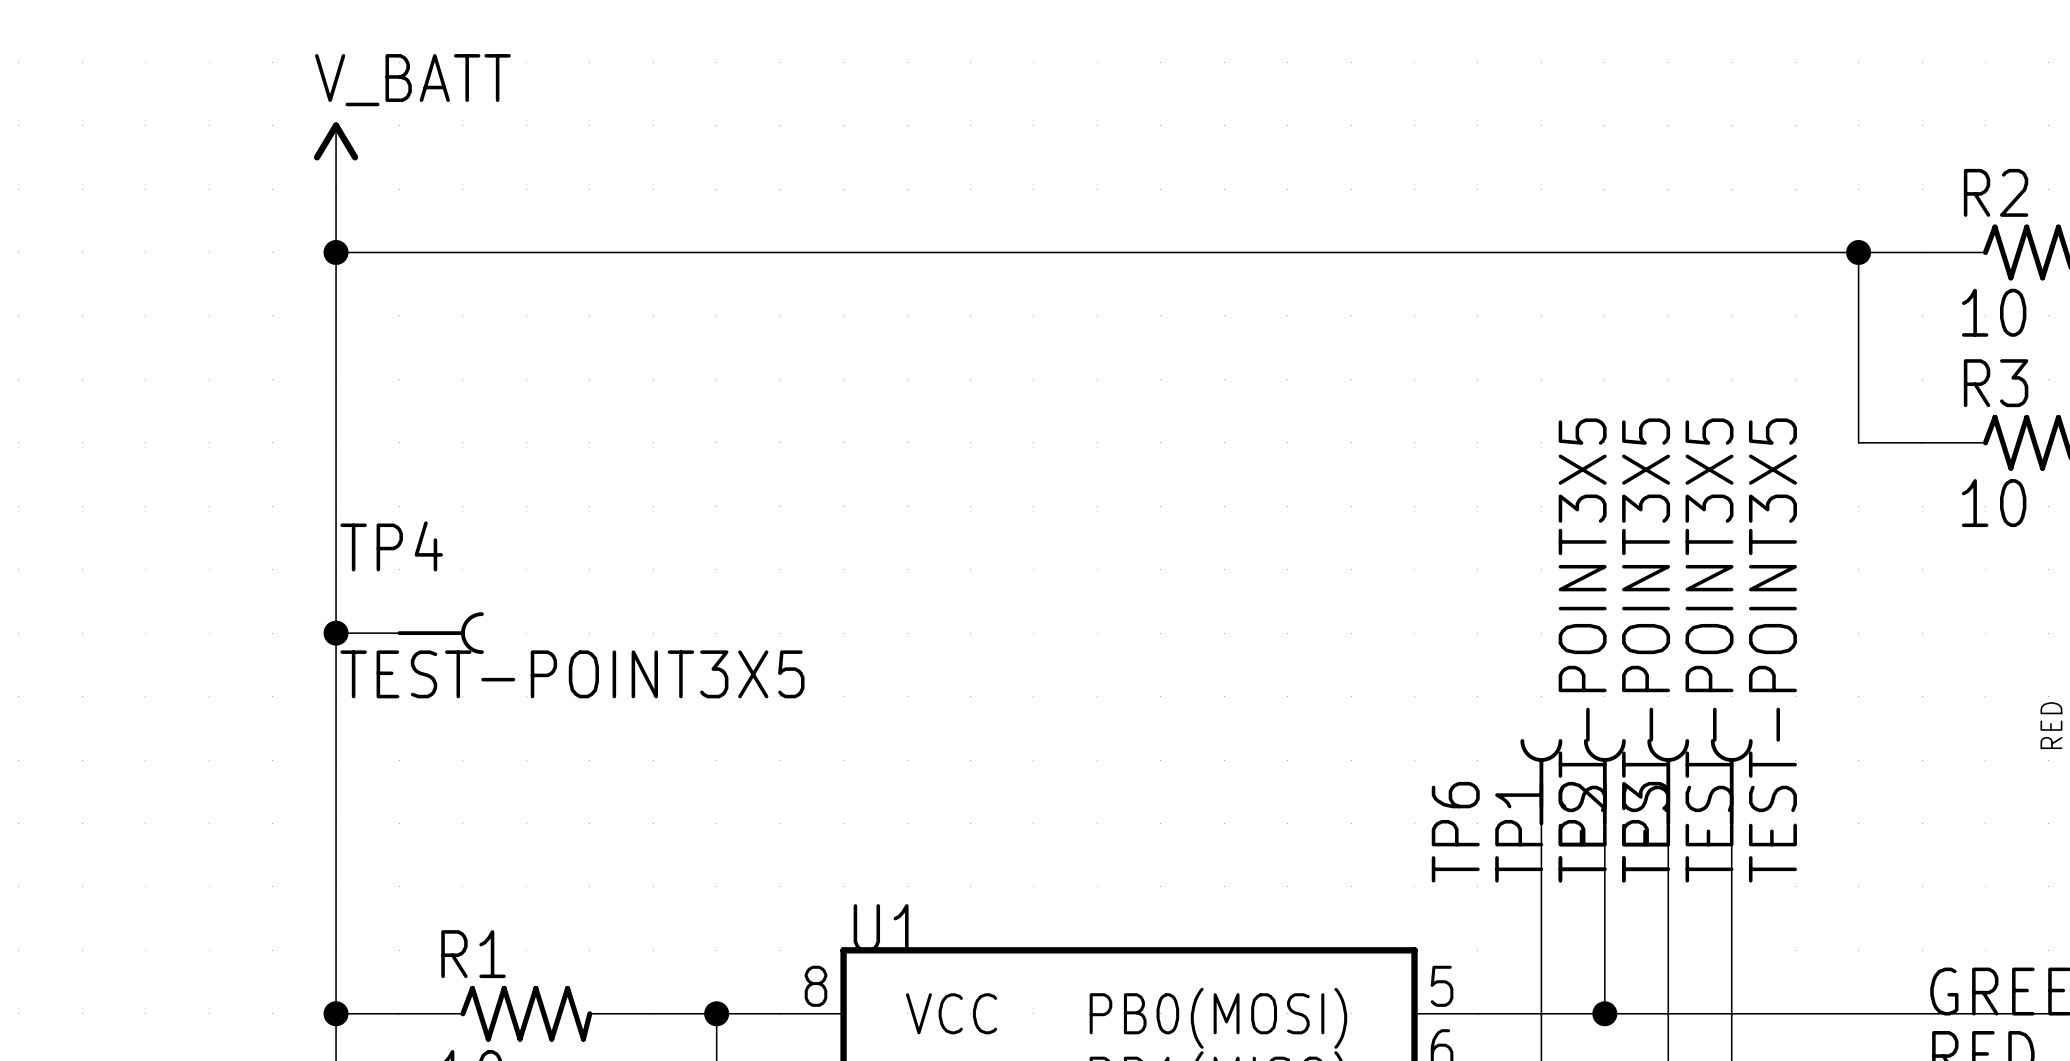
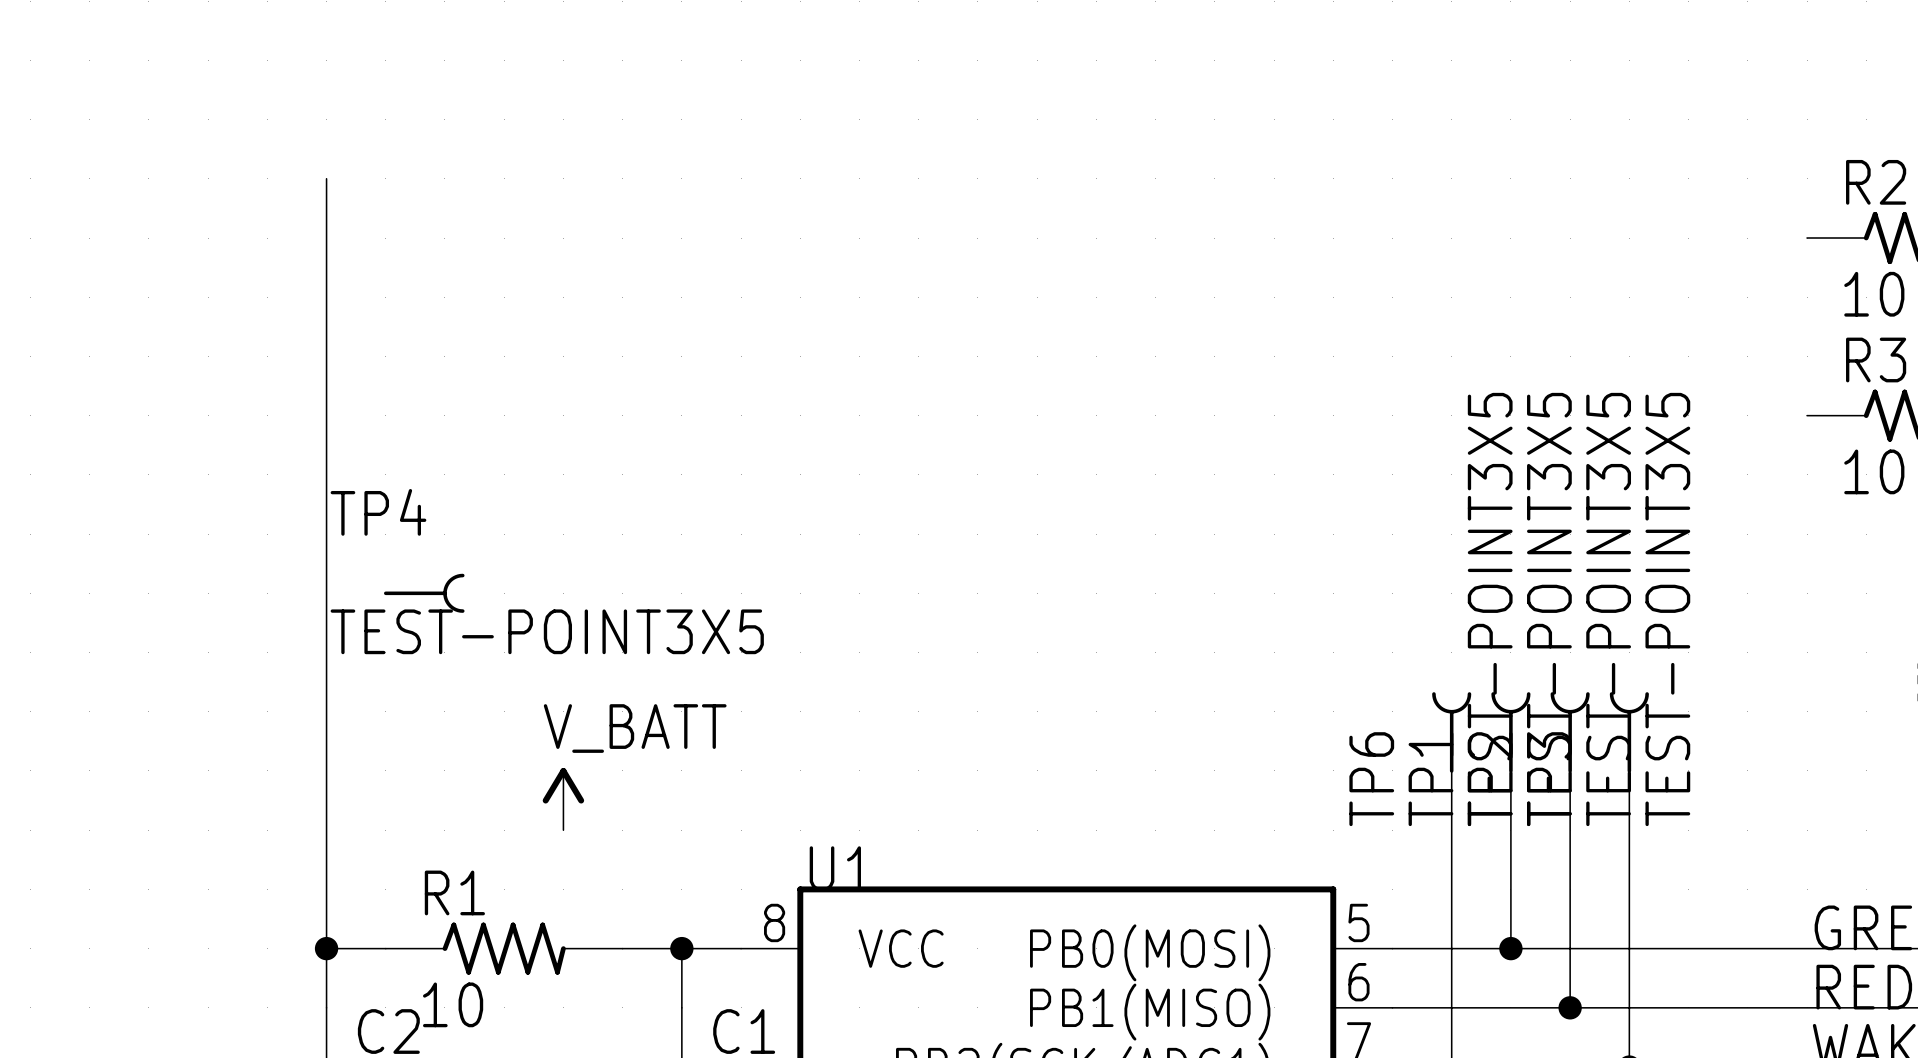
power symbol: V_BATT (336, 155) -> none
wire: (336, 252) (1922, 252) -> none
junction: (336, 252) -> none
wire: (1858, 252) (1858, 442) (1922, 442) -> none
junction: (1858, 252) -> none
wire: (336, 633) (399, 633) -> none
junction: (336, 633) -> none
power symbol: none -> V_BATT (563, 799)

